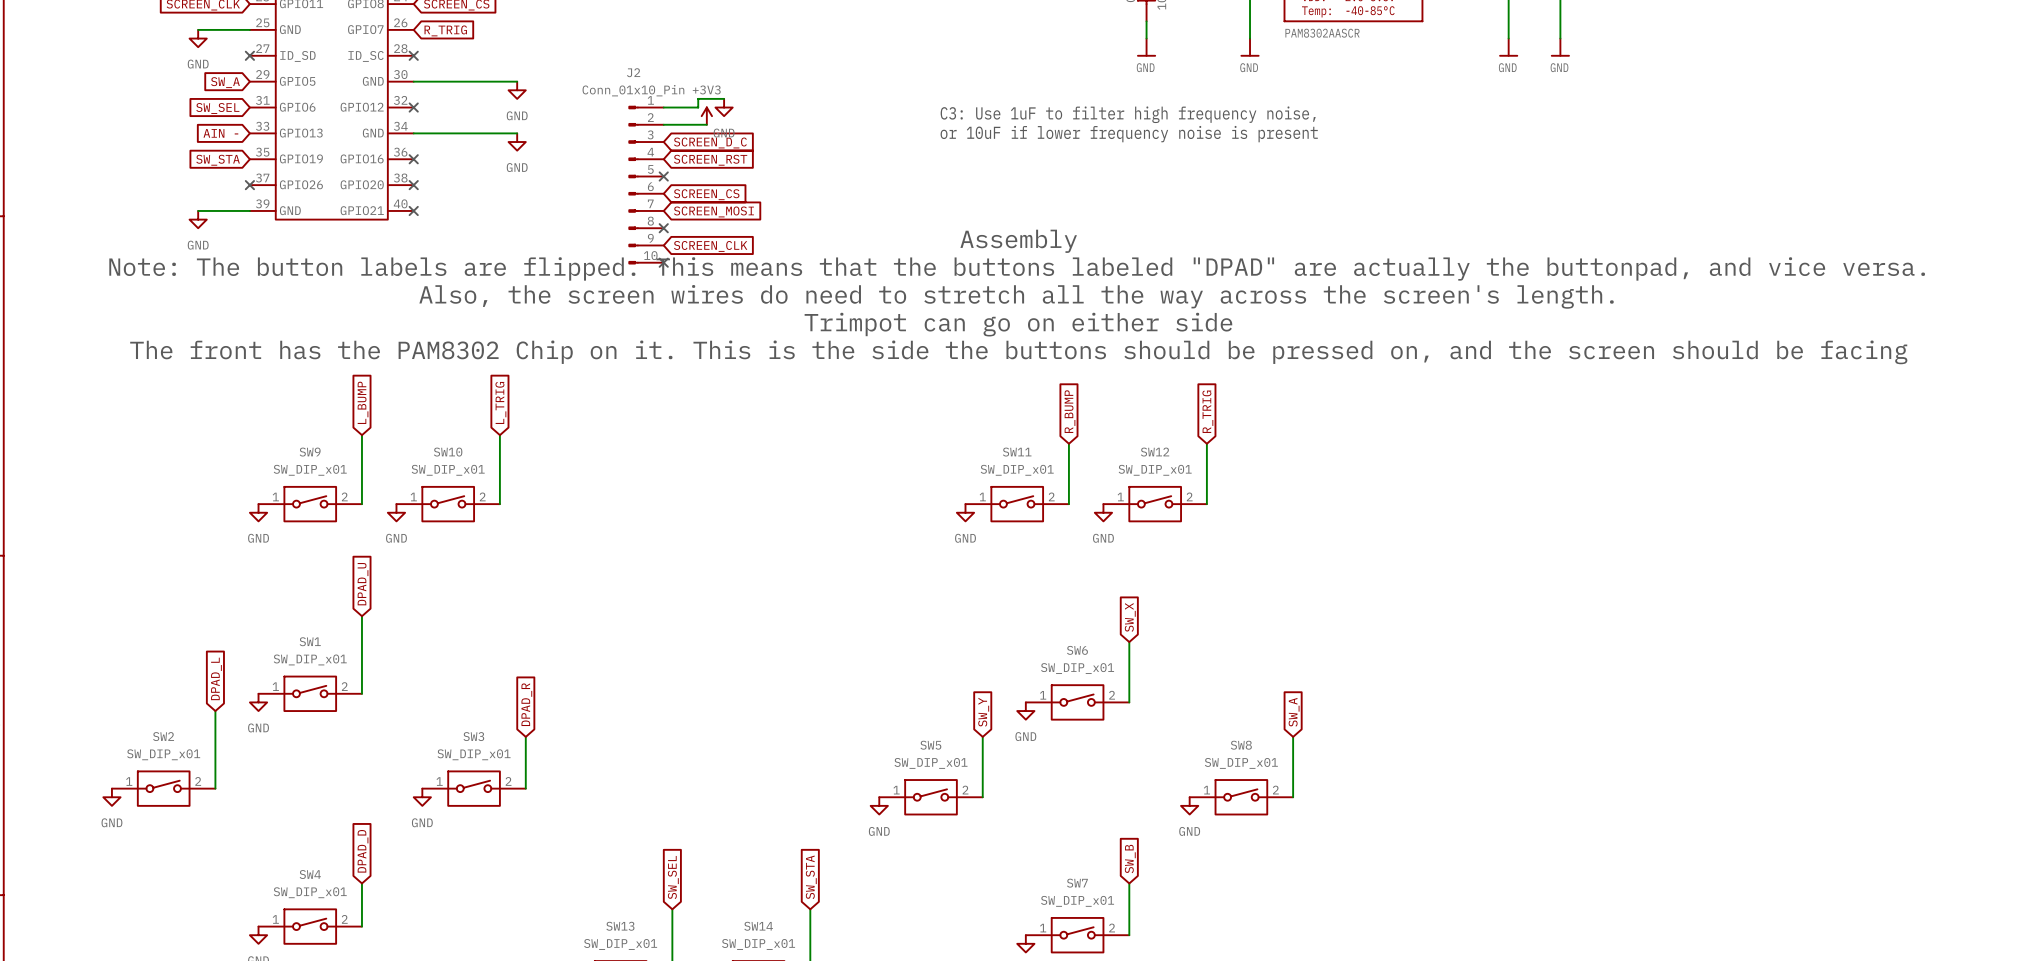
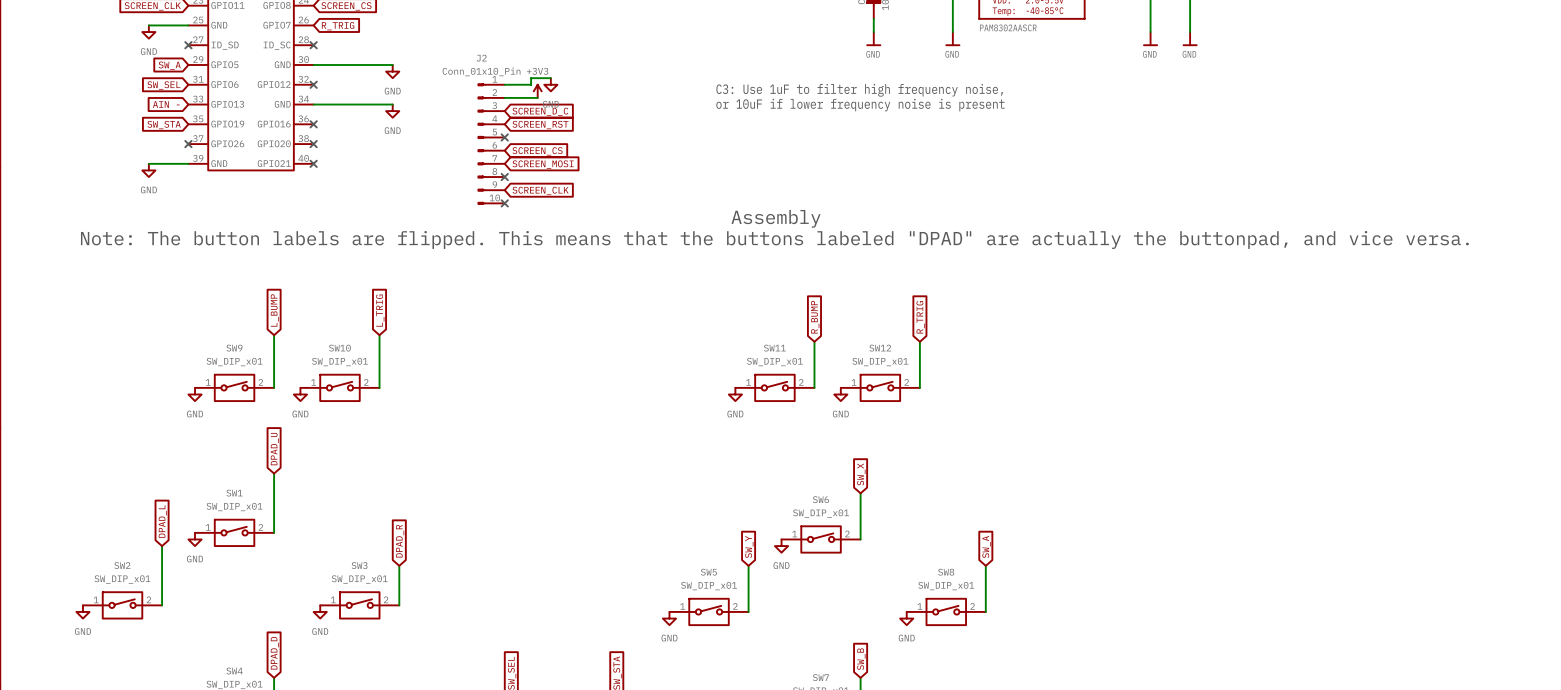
text position: Assembly (1018, 241) -> Assembly (776, 218)
text position: Note: The button labels are flipped. This means that the buttons labeled "DPAD" are actually the buttonpad, and vice versa. (1017, 268) -> Note: The button labels are flipped. This means that the buttons labeled "DPAD" are actually the buttonpad, and vice versa. (774, 239)
text: Also, the screen wires do need to stretch all the way across the screen's length. (1016, 296) -> none
text: Trimpot can go on either side (1018, 324) -> none
text: The front has the PAM8302 Chip on it. This is the side the buttons should be pressed on, and the screen should be facing (1018, 352) -> none

